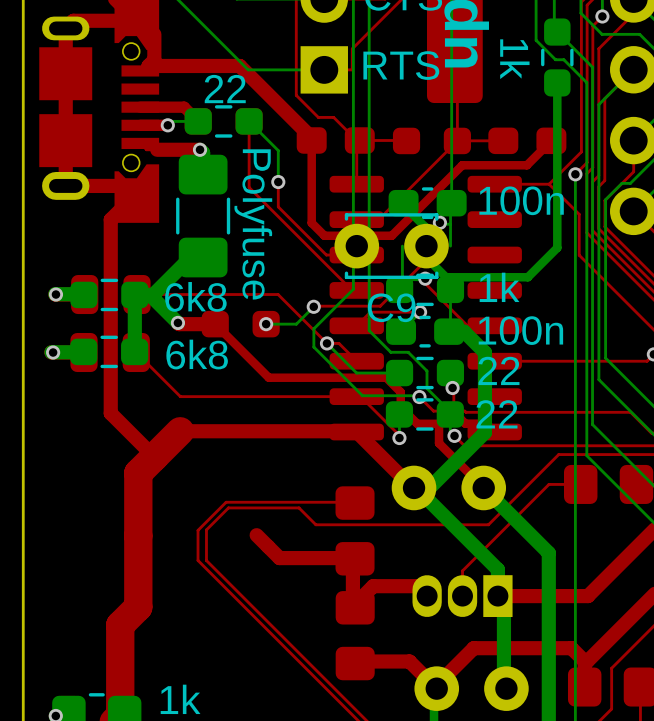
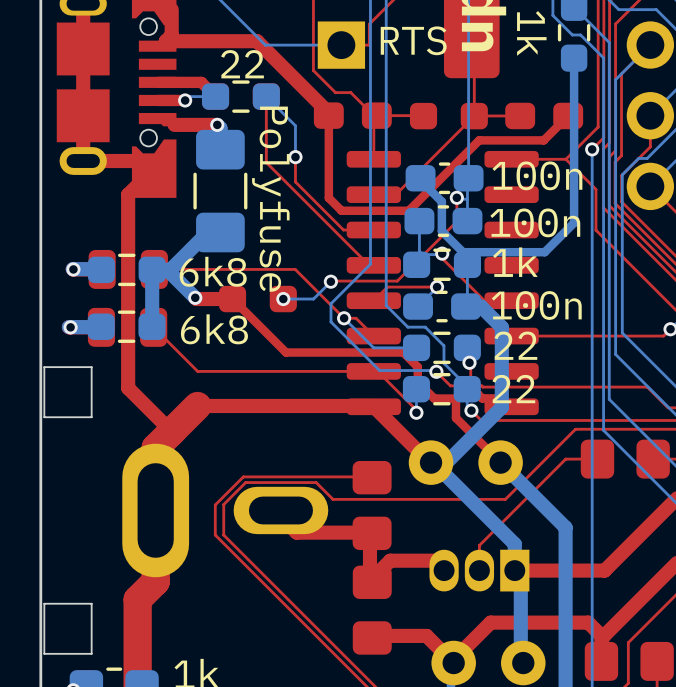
C9: (391, 246) -> none
part: none -> 100n (443, 221)
part: none -> (186, 510)

